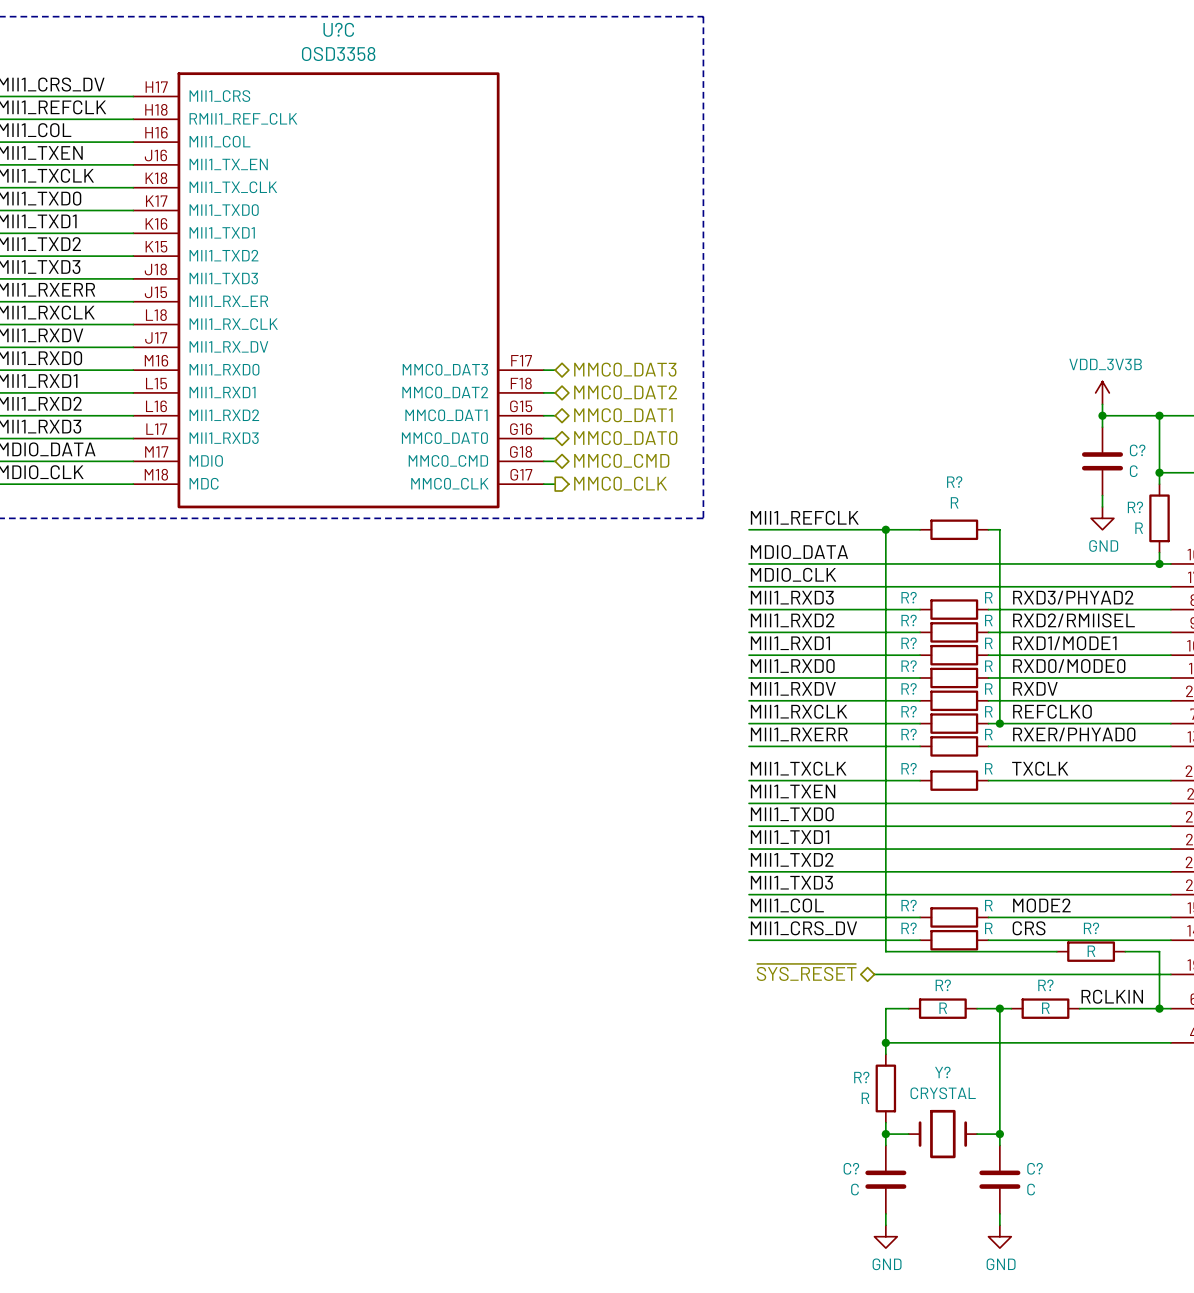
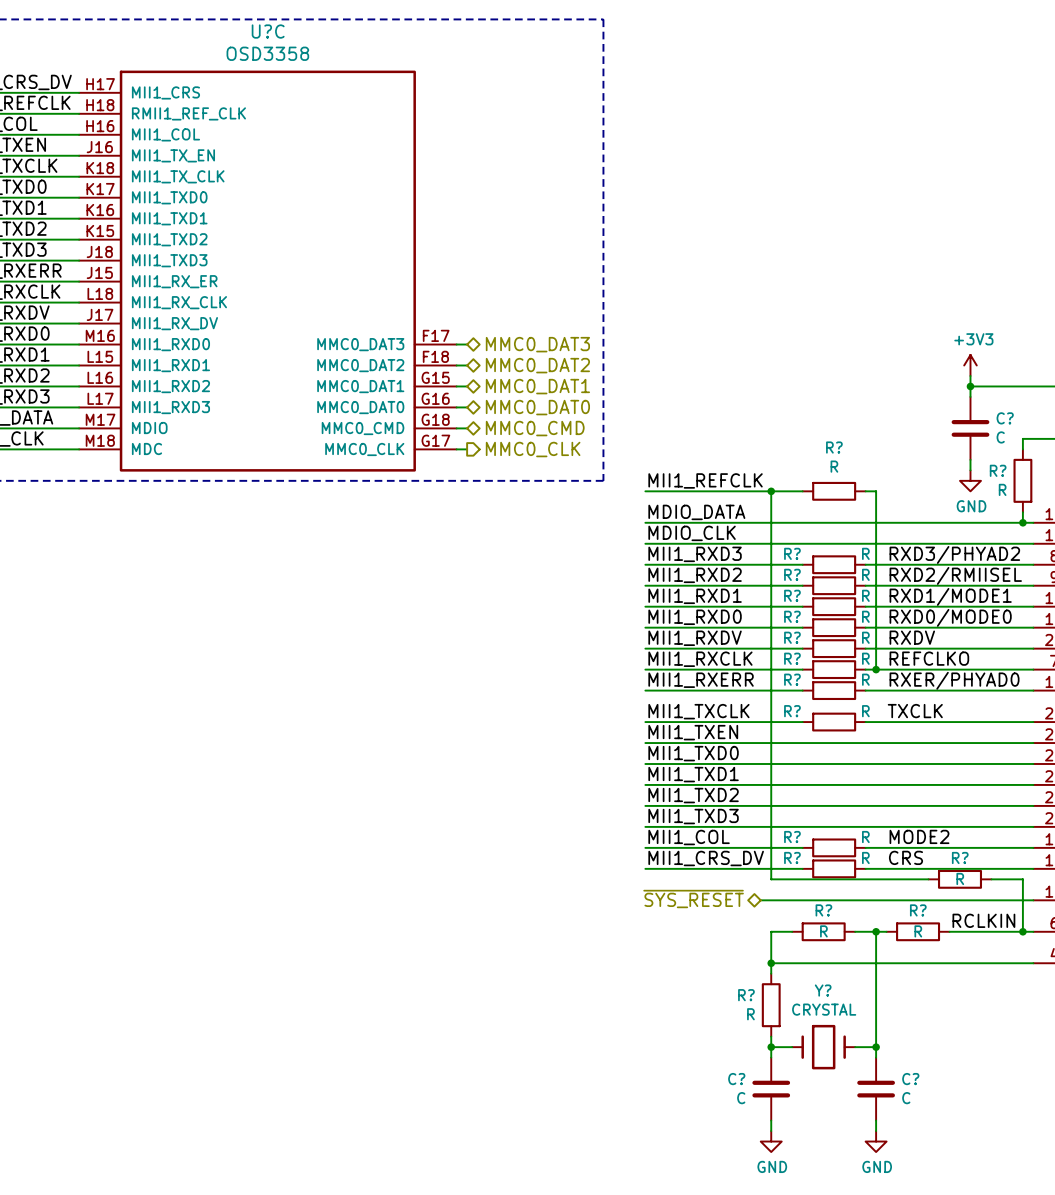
power symbol: VDD_3V3B (1102, 392) -> +3V3 (970, 365)
wire: (1159, 415) (1159, 472) -> none
junction: (1159, 415) -> none
junction: (1159, 472) -> none

